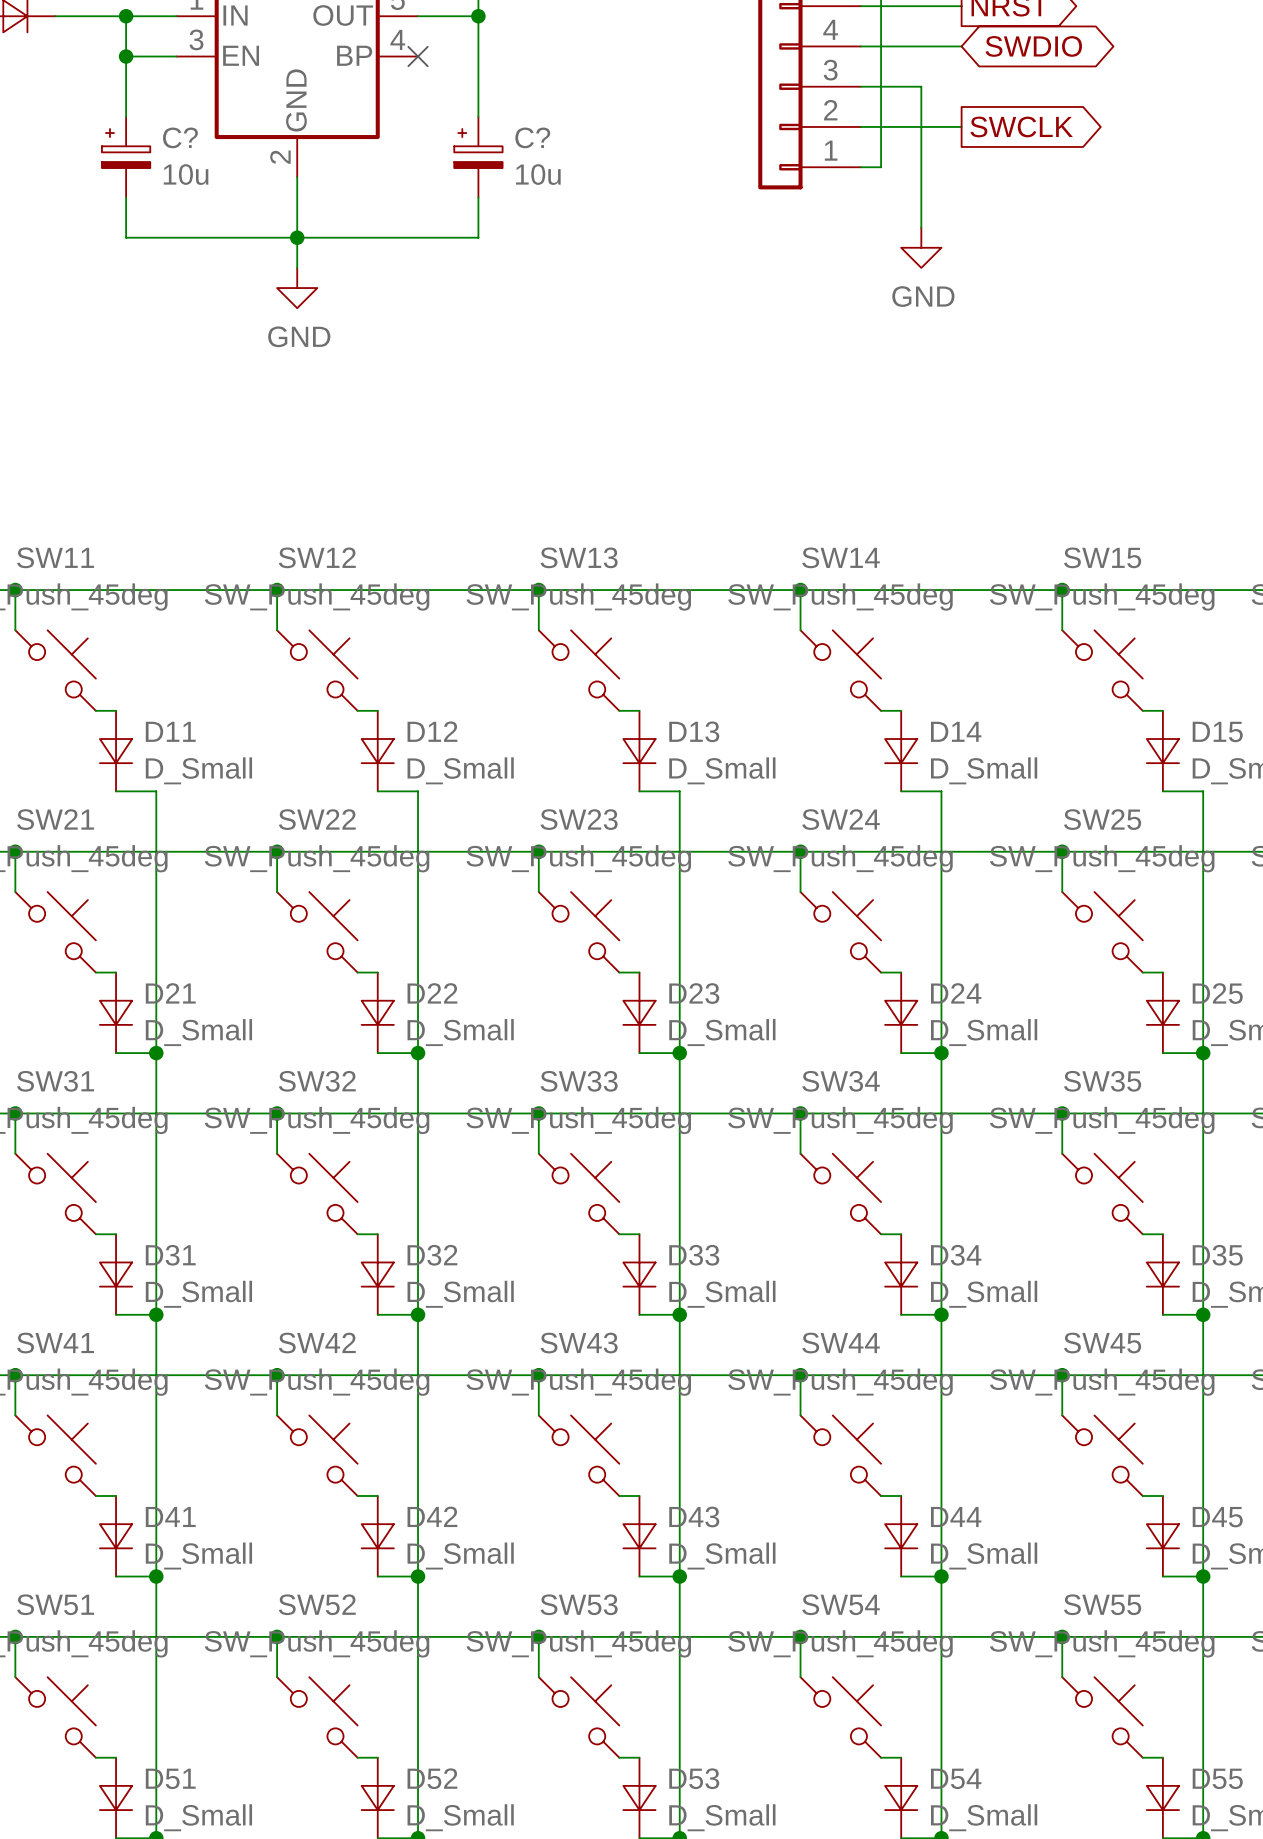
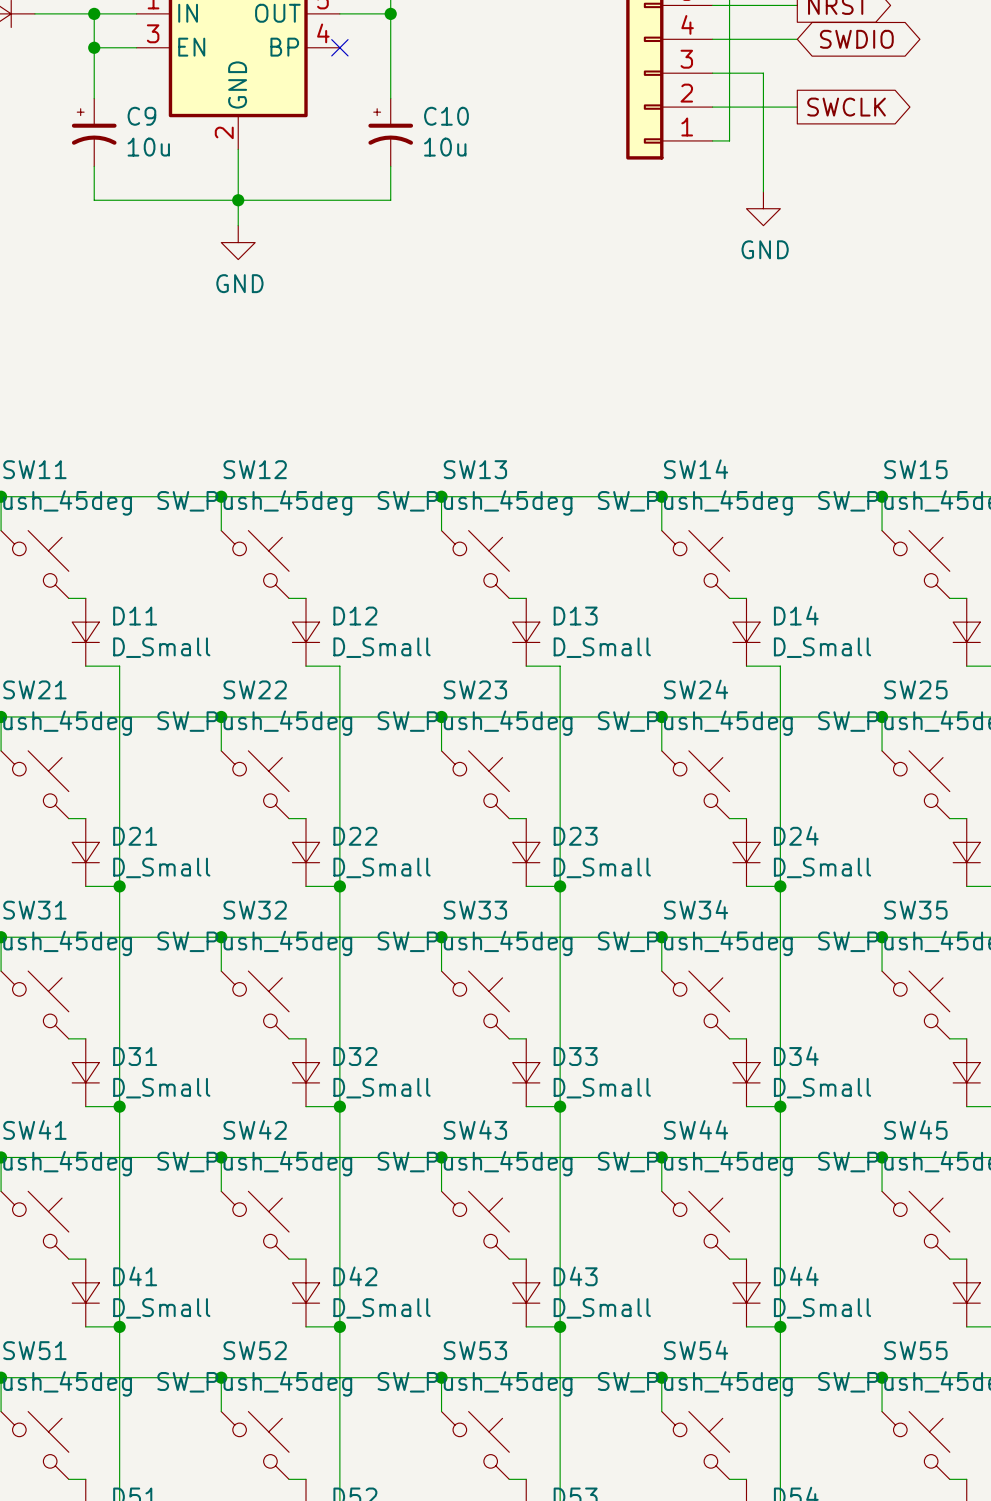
C?: 10u (126, 157) -> none
C9: none -> 10u (94, 132)
C?: 10u (478, 157) -> none
C10: none -> 10u (390, 132)

